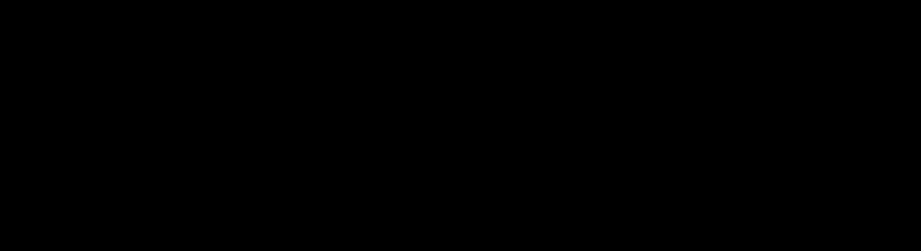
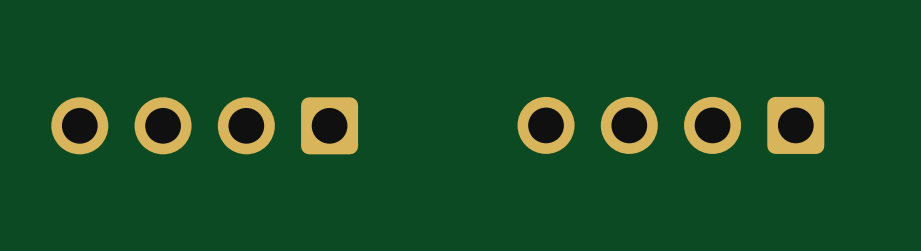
part: none -> (204, 125)
part: none -> (670, 125)

